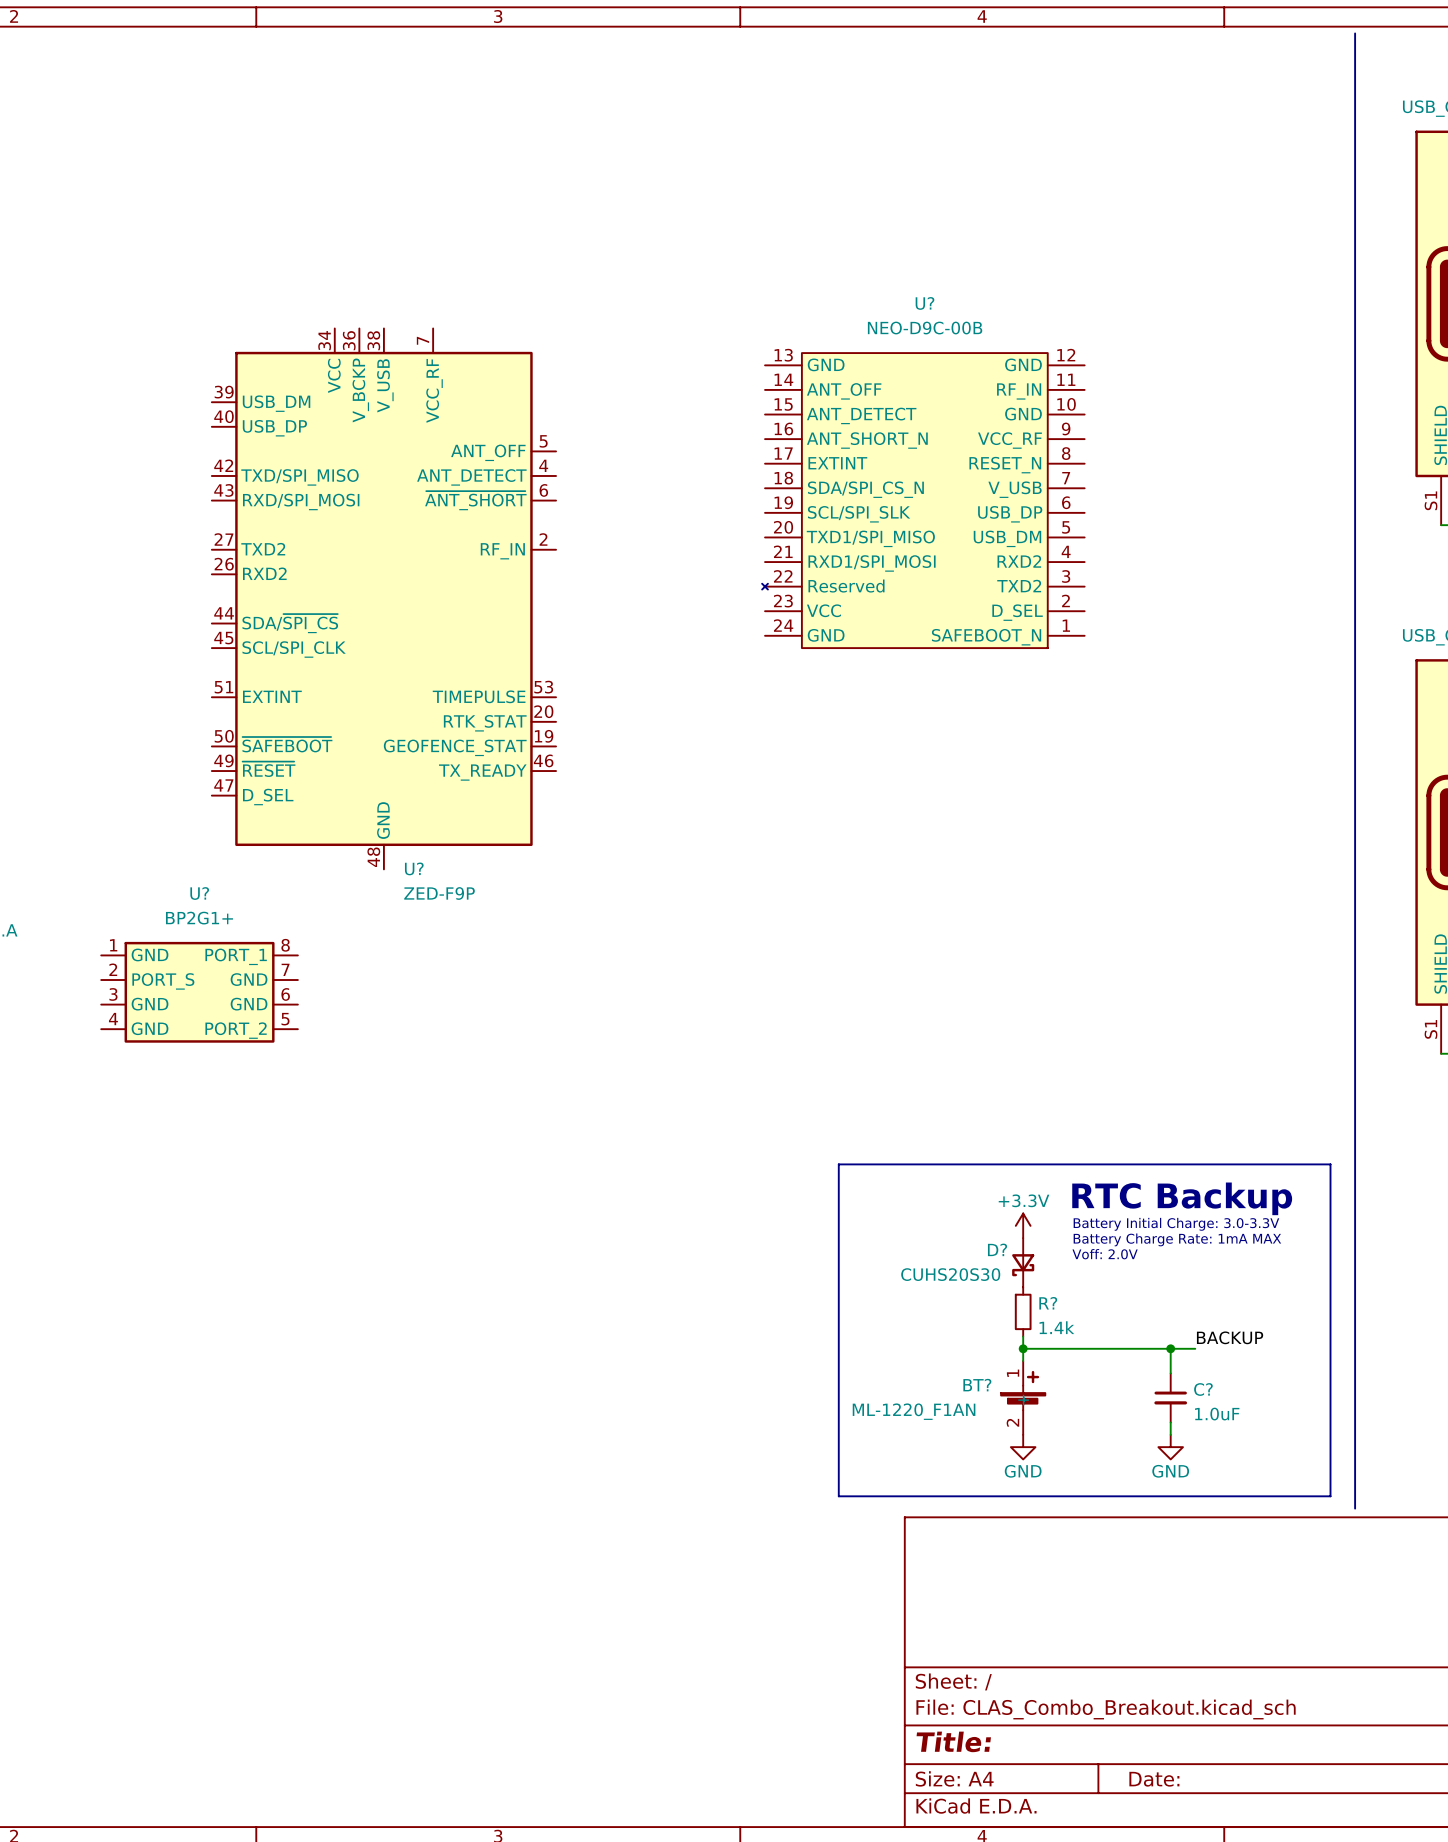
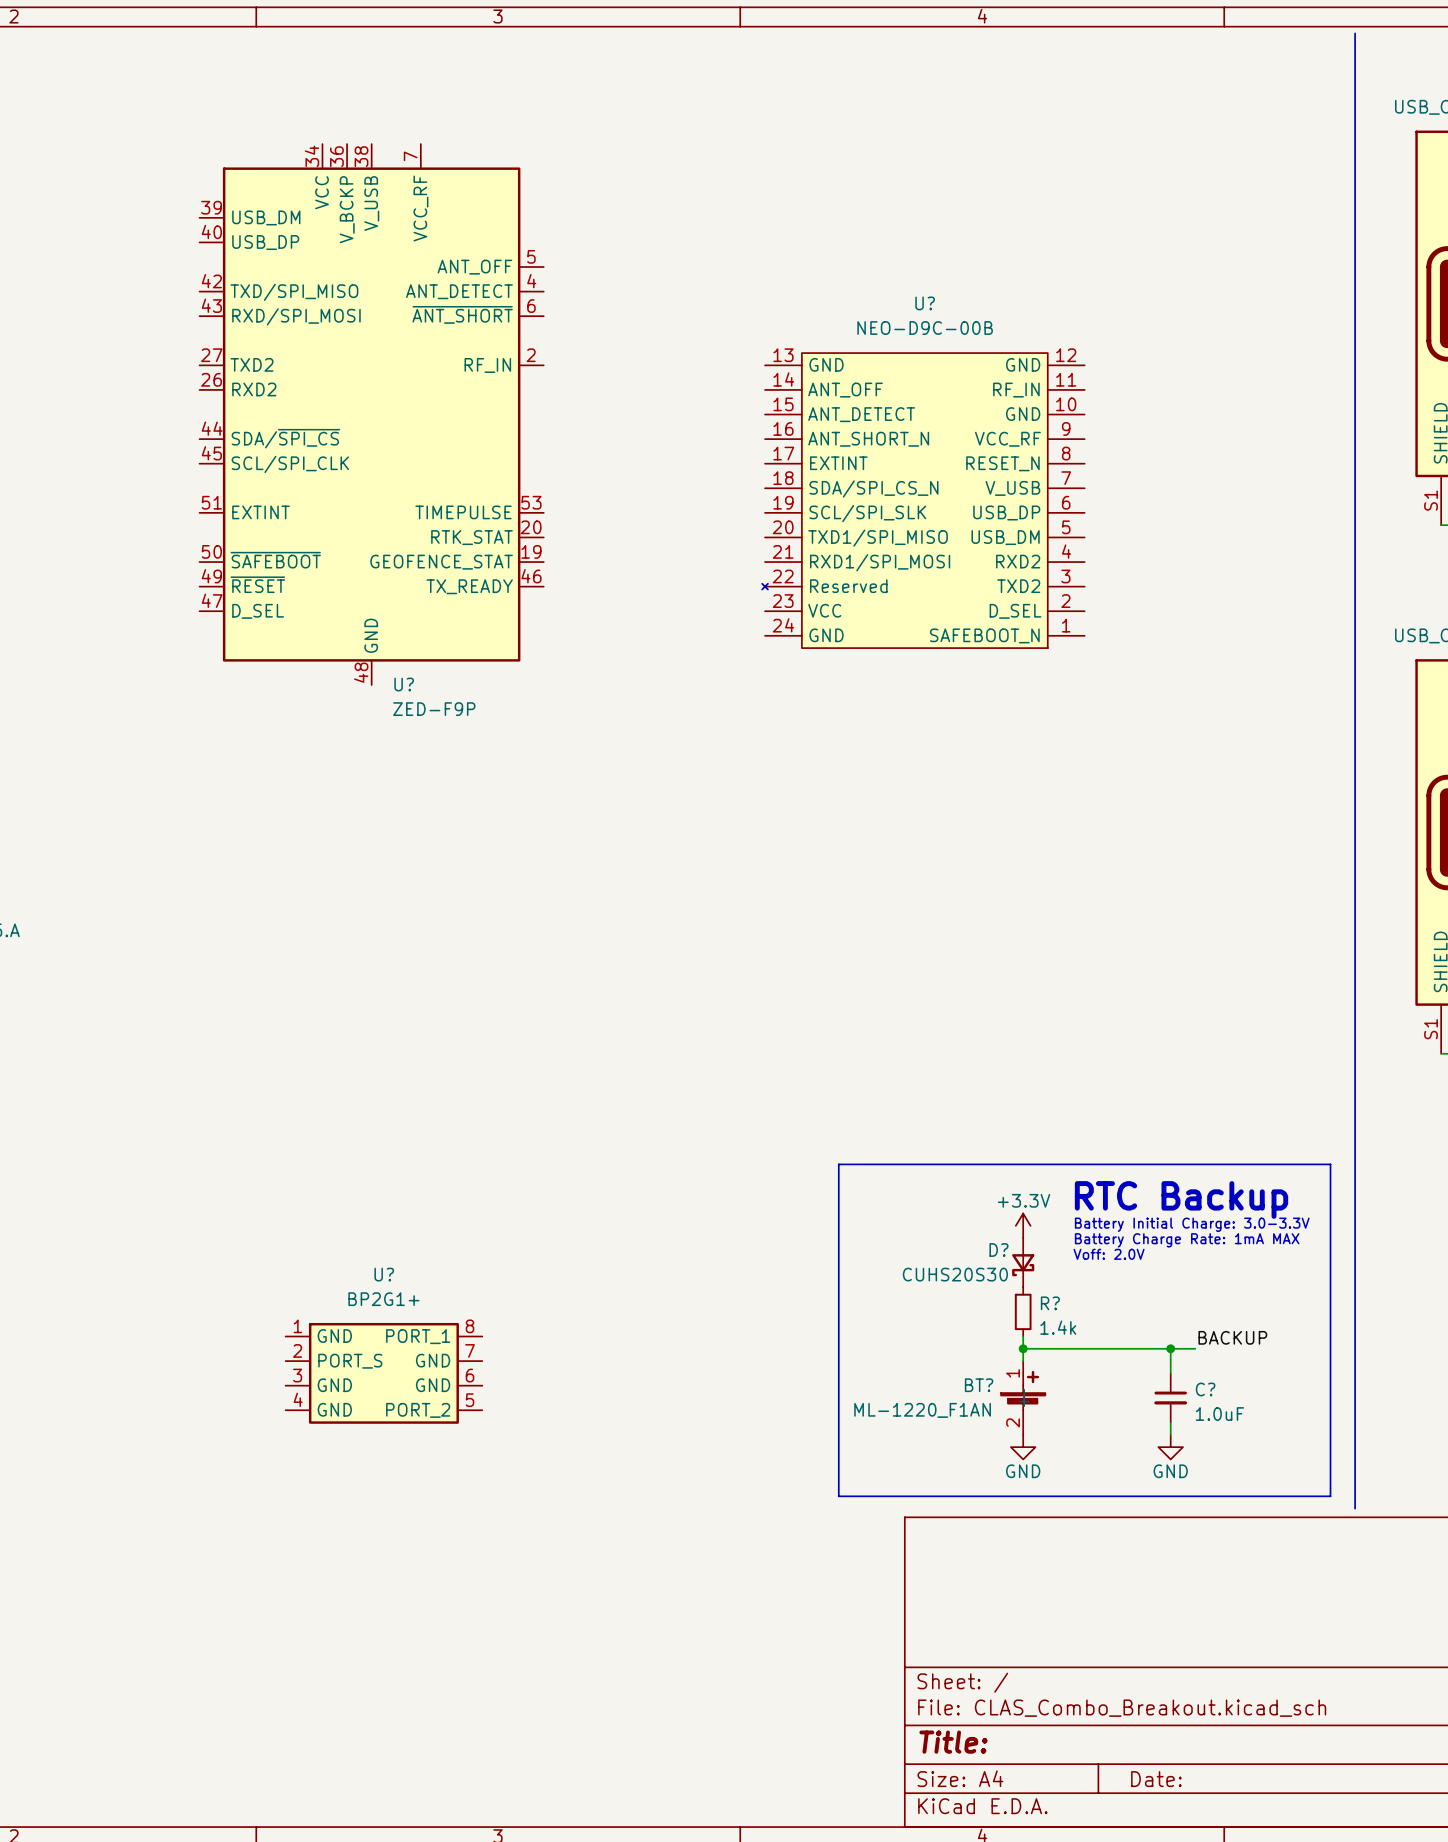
U? position: (383, 598) -> (371, 414)
U?: BP2G1+ (199, 992) -> none
U?: none -> BP2G1+ (383, 1373)

